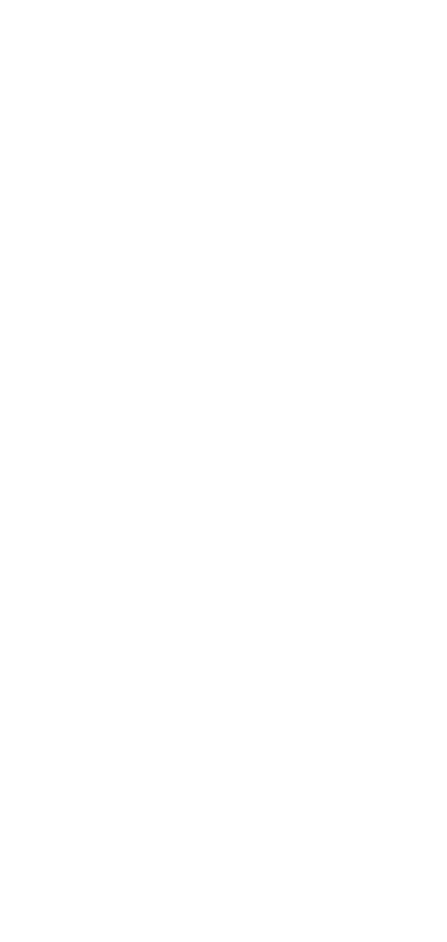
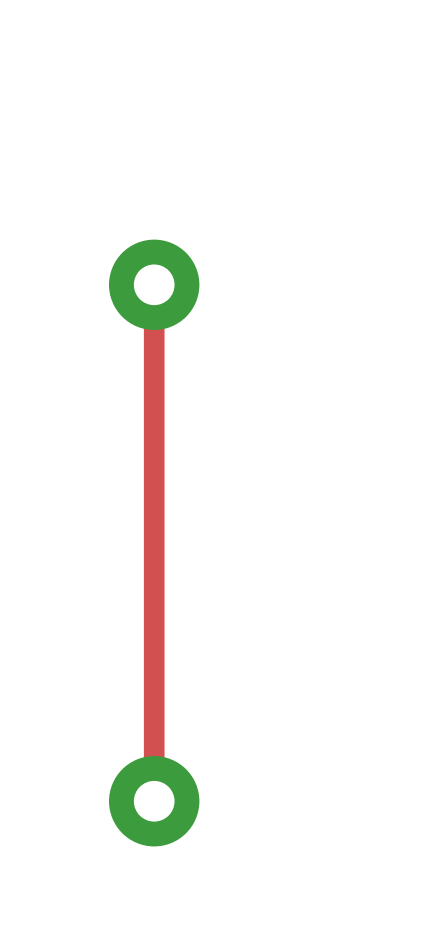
track: none -> (154, 284) (154, 801)
via: none -> (154, 284)
via: none -> (154, 801)

